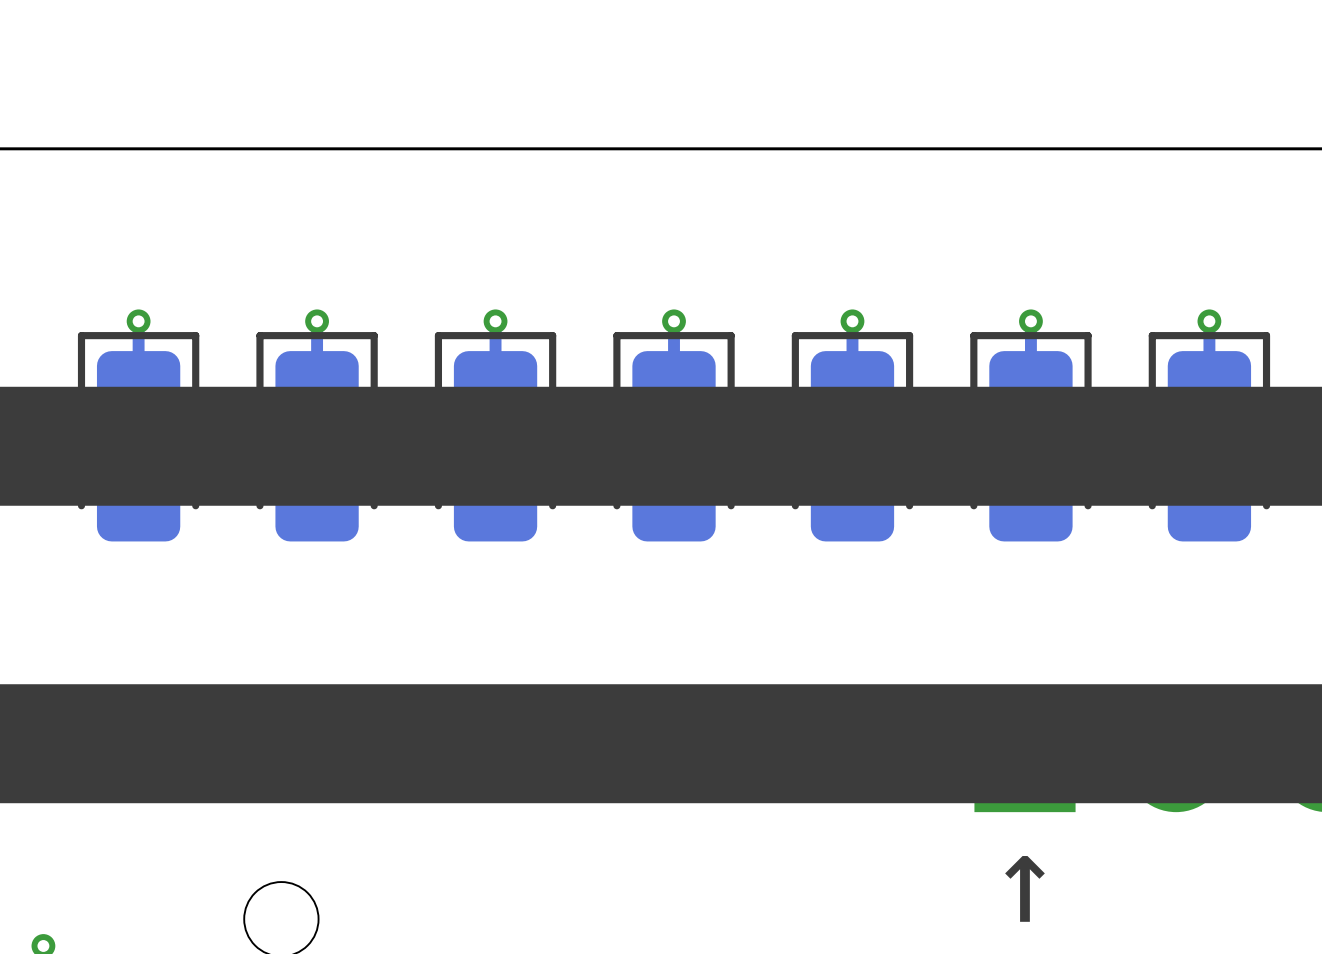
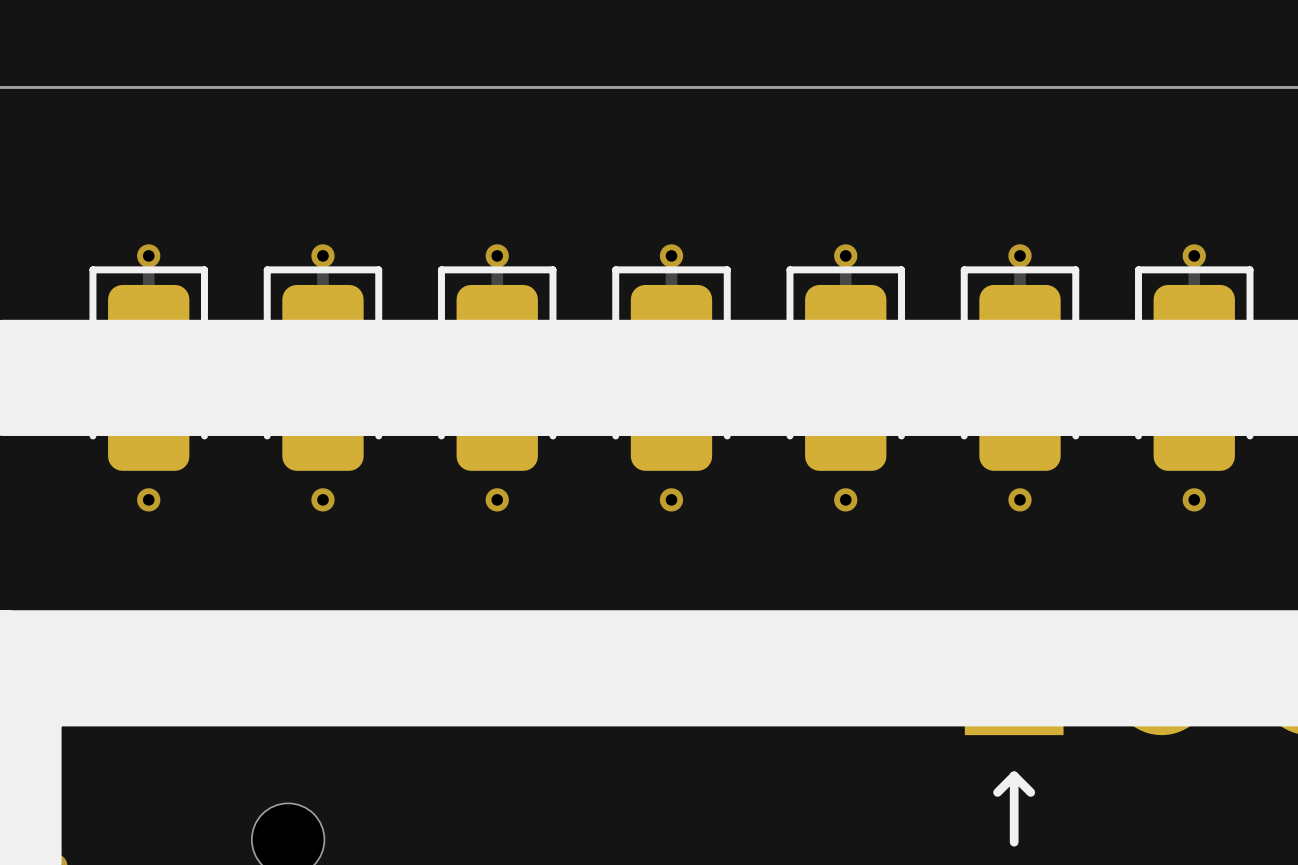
via: none -> (148, 499)
via: none -> (322, 499)
via: none -> (497, 499)
via: none -> (671, 499)
via: none -> (845, 499)
via: none -> (1020, 499)
via: none -> (1194, 499)

